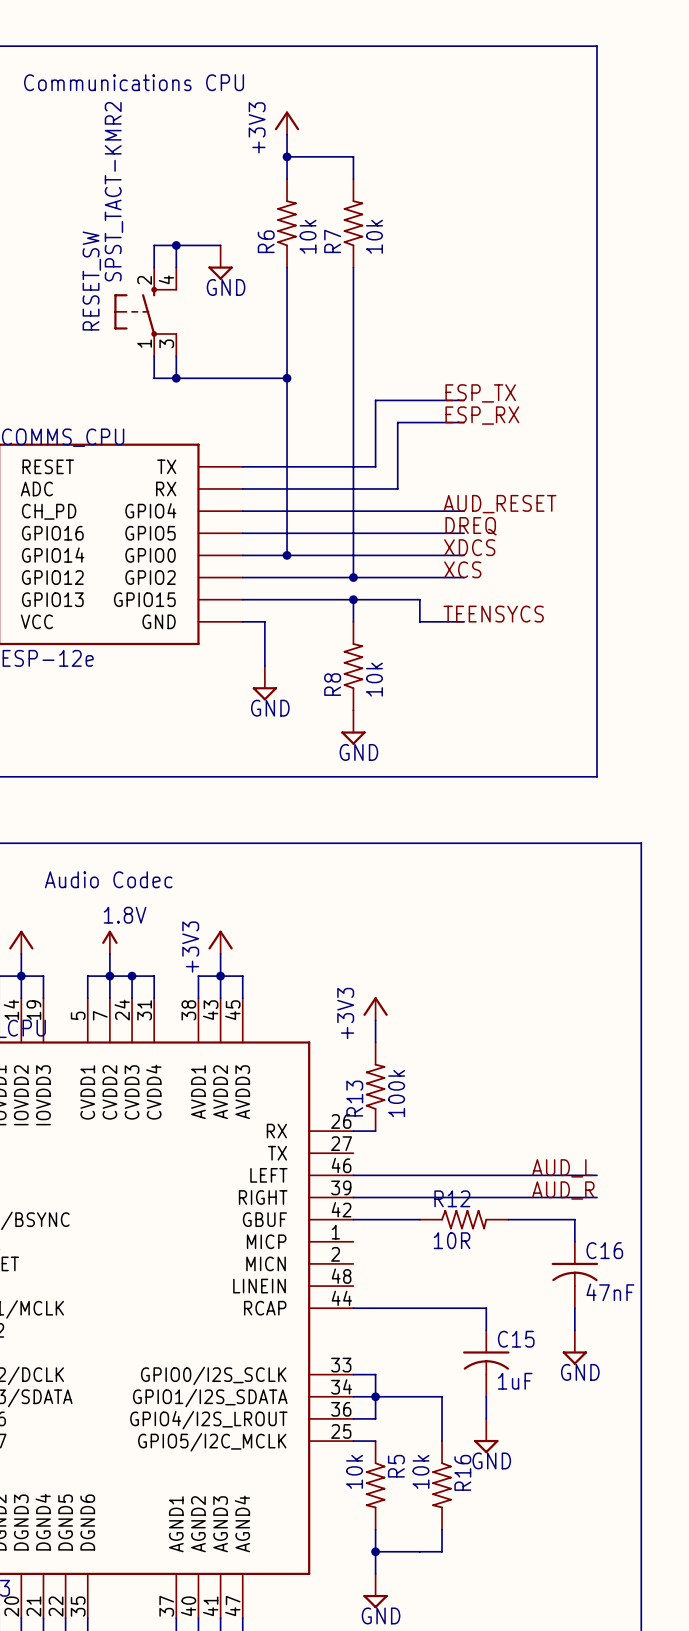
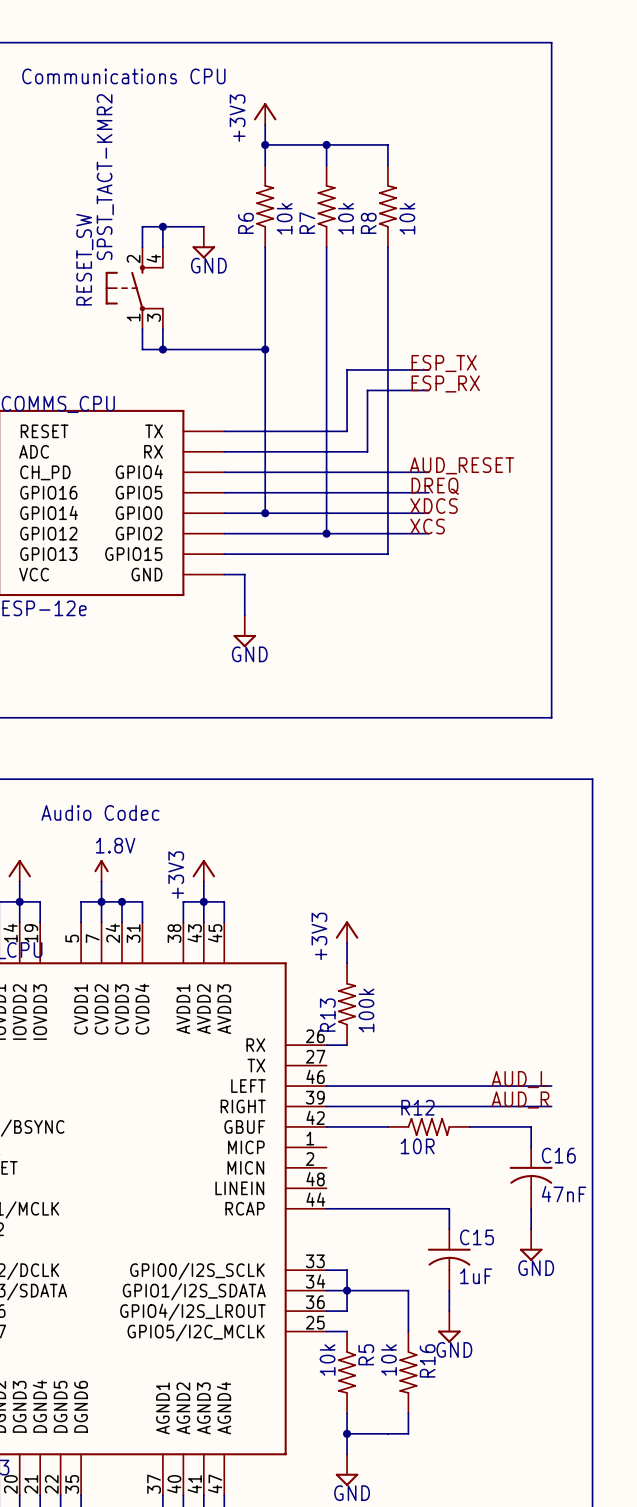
wire: none -> (326, 144) (387, 144) (387, 165)
junction: none -> (326, 144)
wire: (353, 599) (353, 621) -> none
junction: (353, 599) -> none
wire: (419, 599) (419, 621) (464, 621) -> (387, 554) (387, 247)
label: TEENSYCS (493, 614) -> none
R8 position: (353, 666) -> (387, 206)
power symbol: GND (353, 727) -> none

